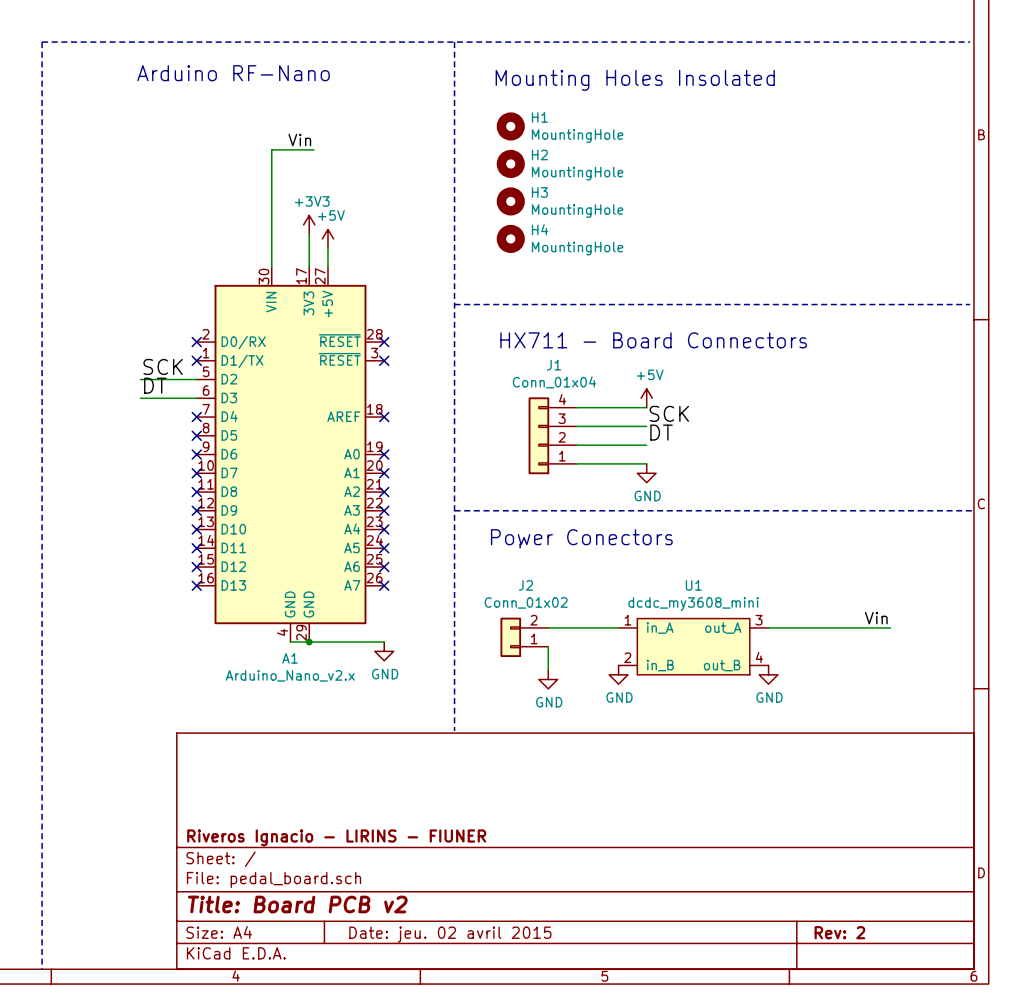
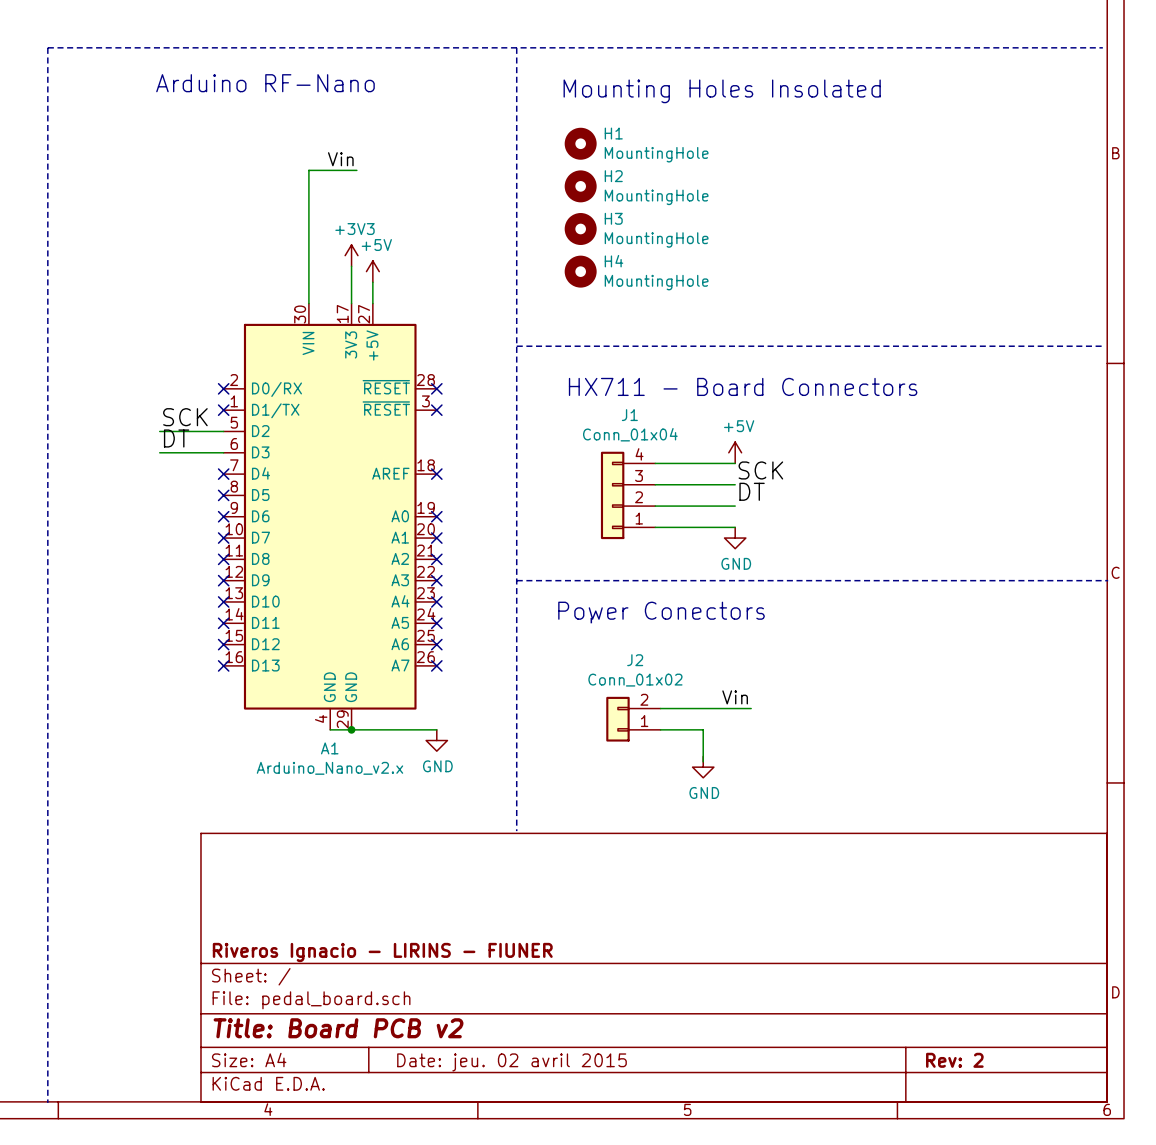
label: none -> Vin (735, 697)
label: Vin (876, 618) -> none
wire: none -> (660, 708) (751, 708)
wire: (548, 627) (618, 627) -> none
wire: (768, 627) (890, 627) -> none
J2 position: (524, 637) -> (633, 719)
wire: none -> (660, 729) (703, 729) (703, 761)
wire: (548, 646) (548, 670) -> none
U1: dcdc_my3608_mini (693, 646) -> none
power symbol: GND (768, 674) -> none
power symbol: GND (548, 679) -> none

